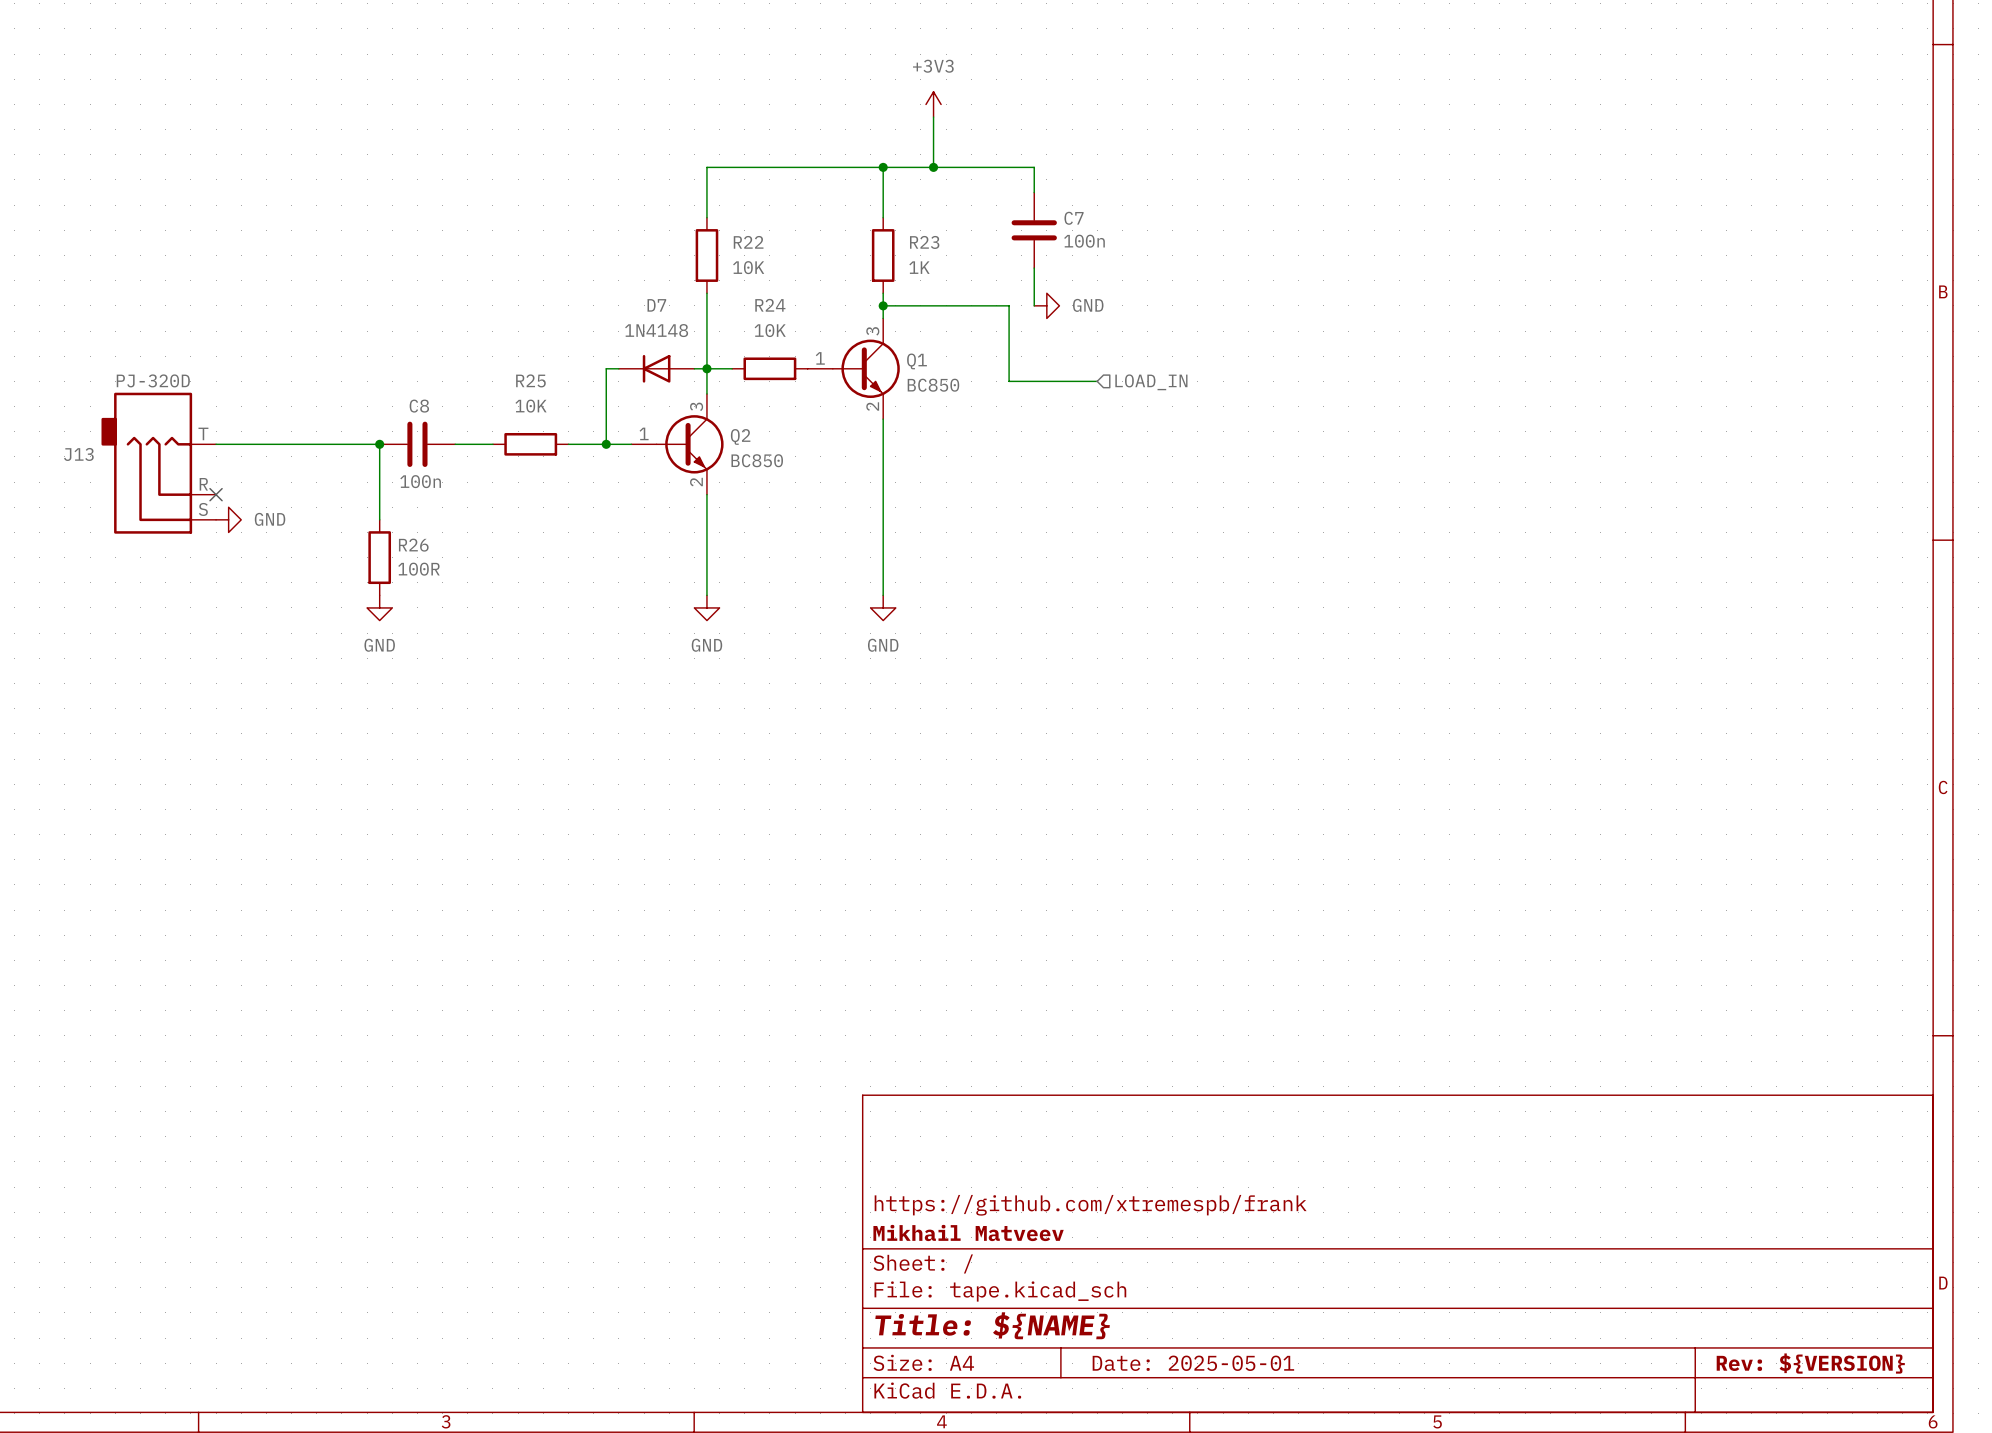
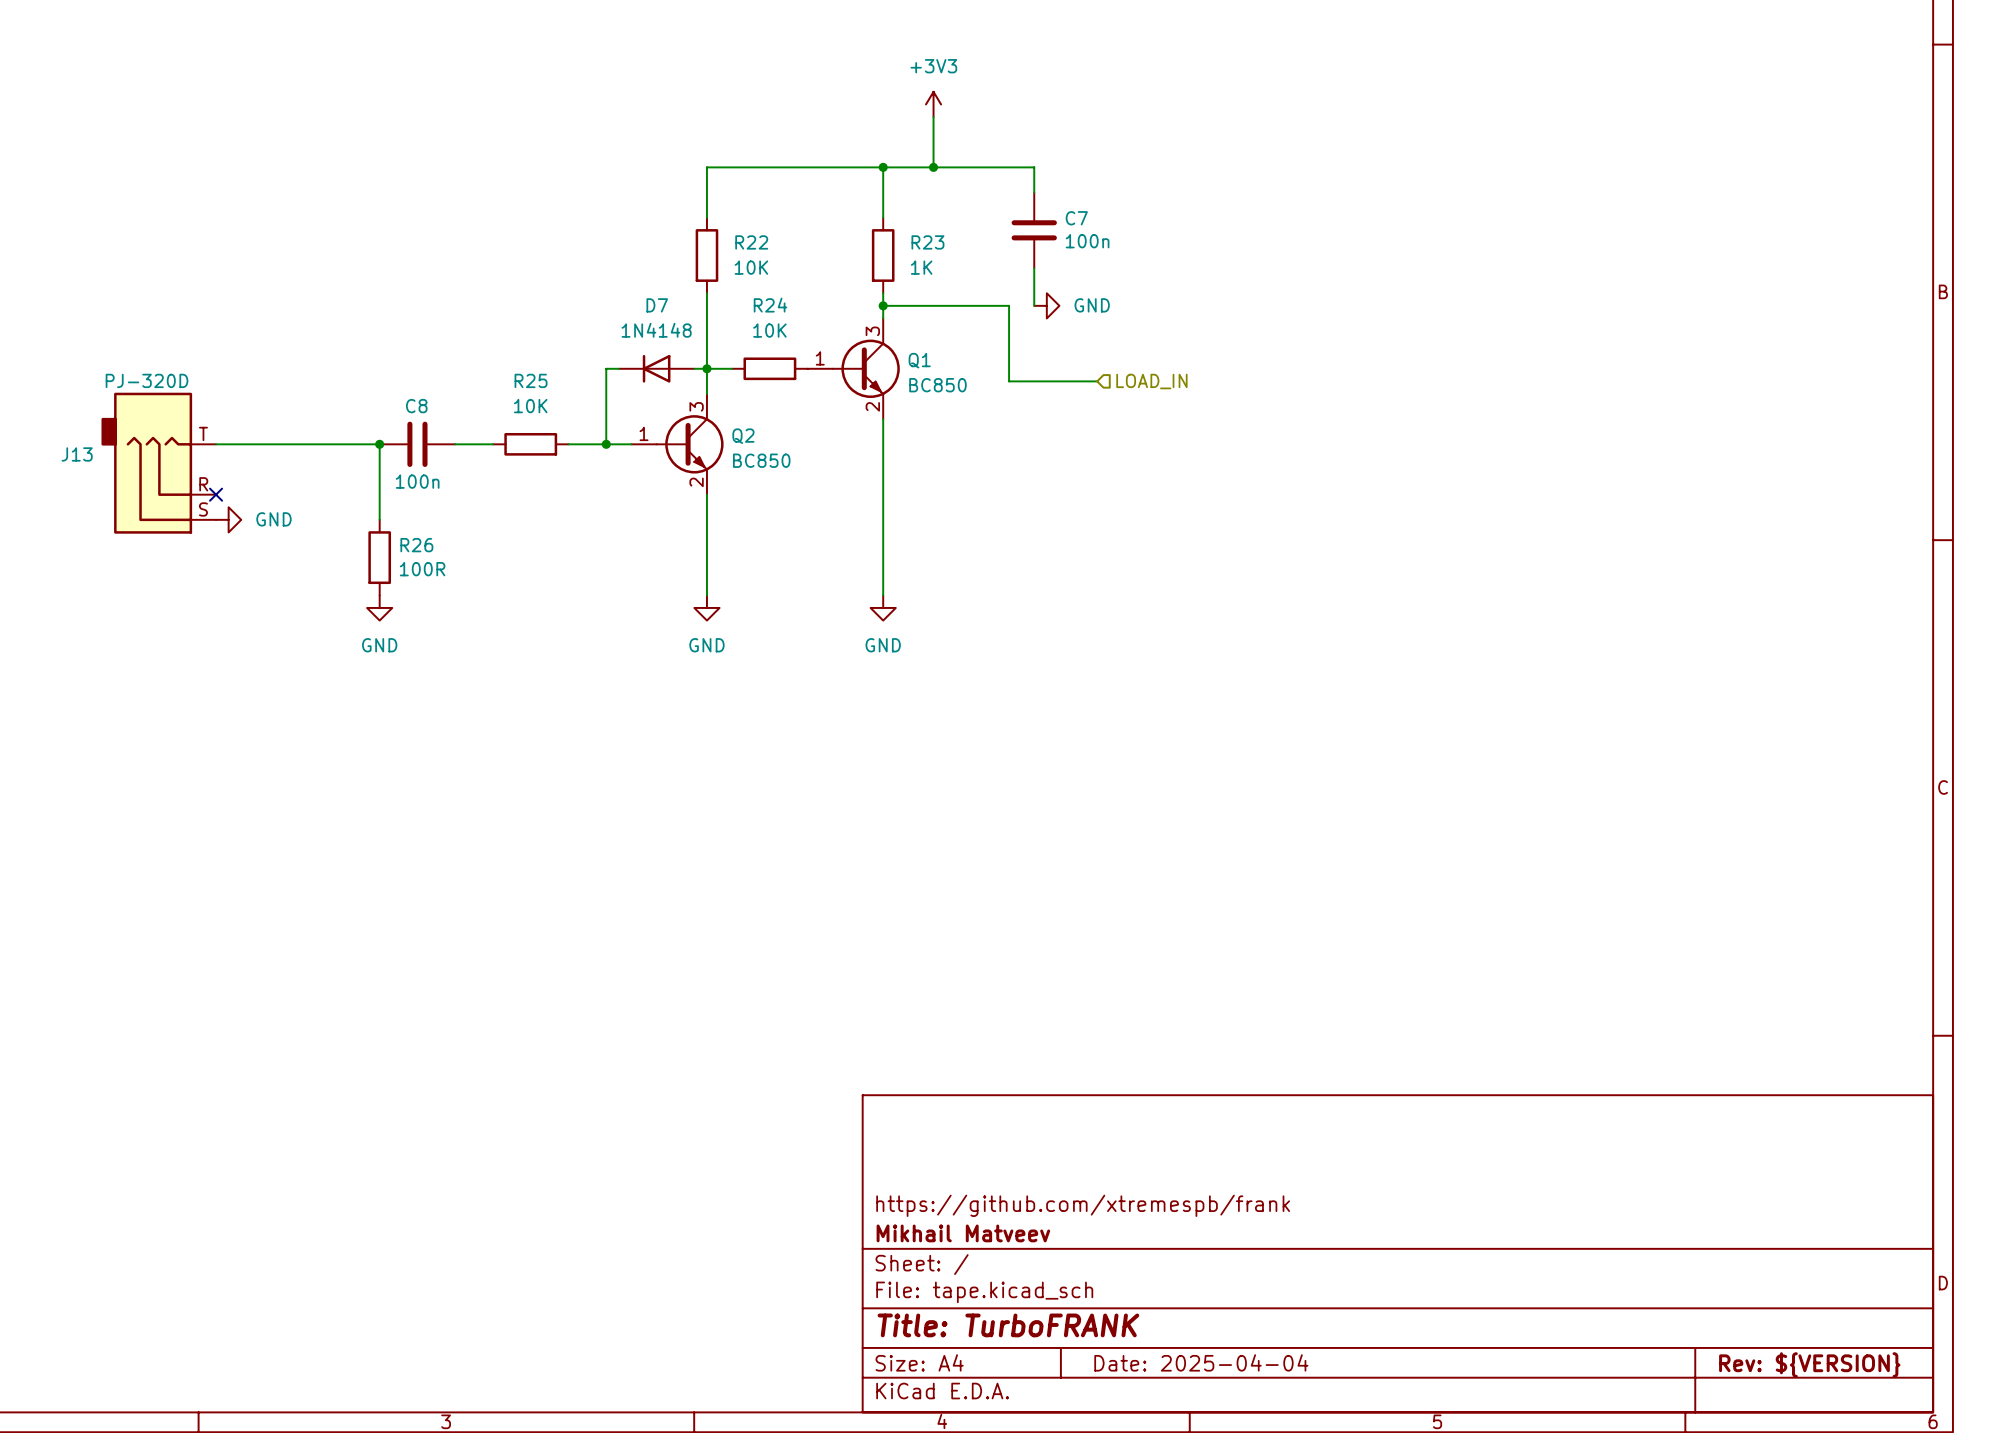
title block: Title: ${NAME} (992, 1325) -> Title: TurboFRANK (1008, 1325)
title block: Date: 2025-05-01 (1193, 1363) -> Date: 2025-04-04 (1201, 1362)

